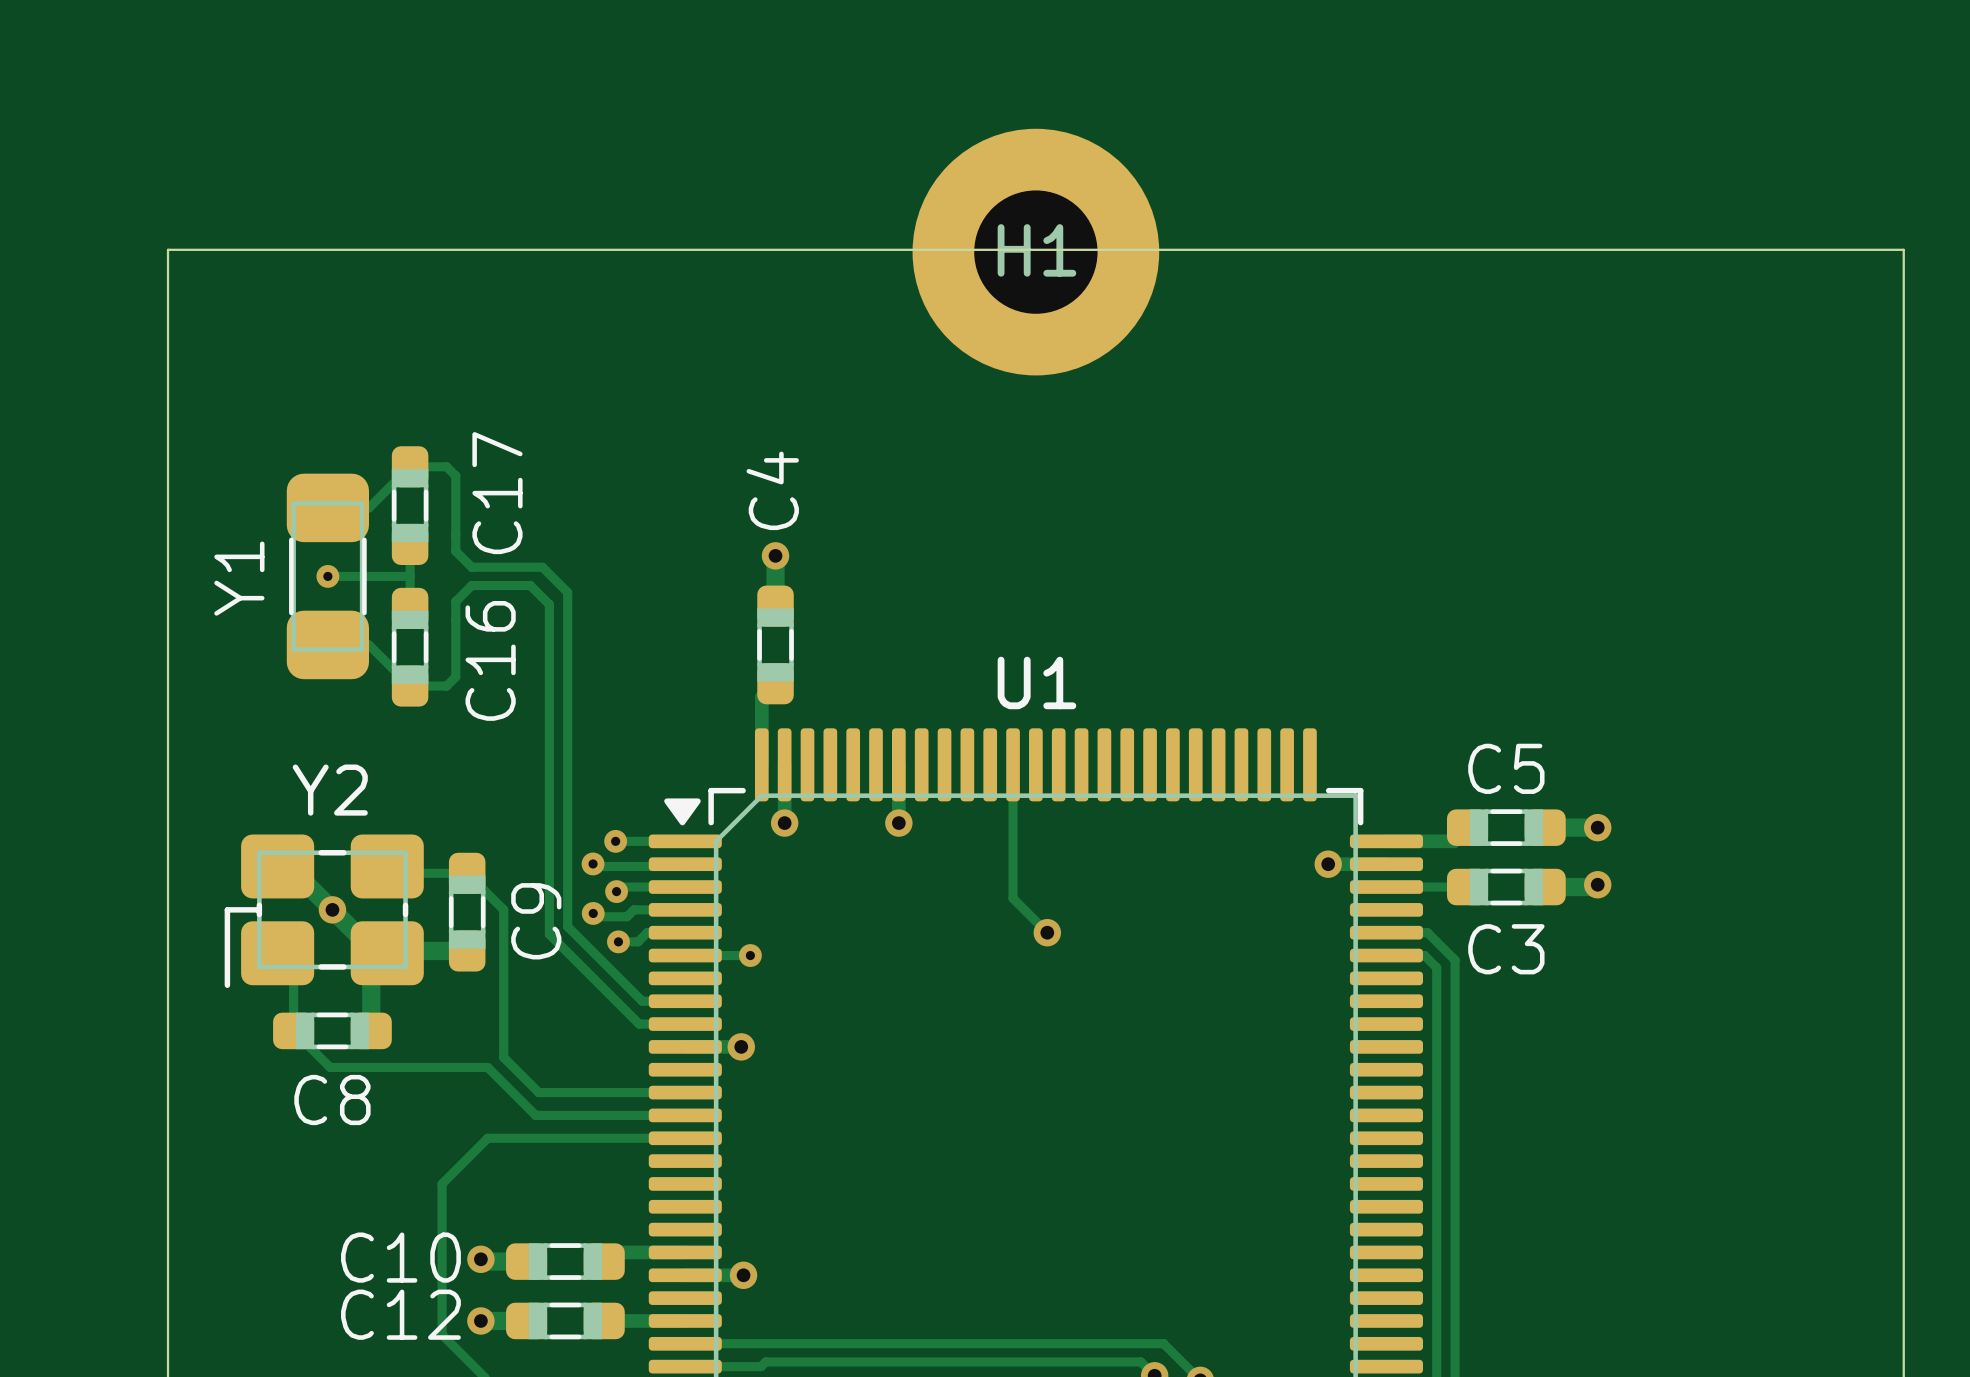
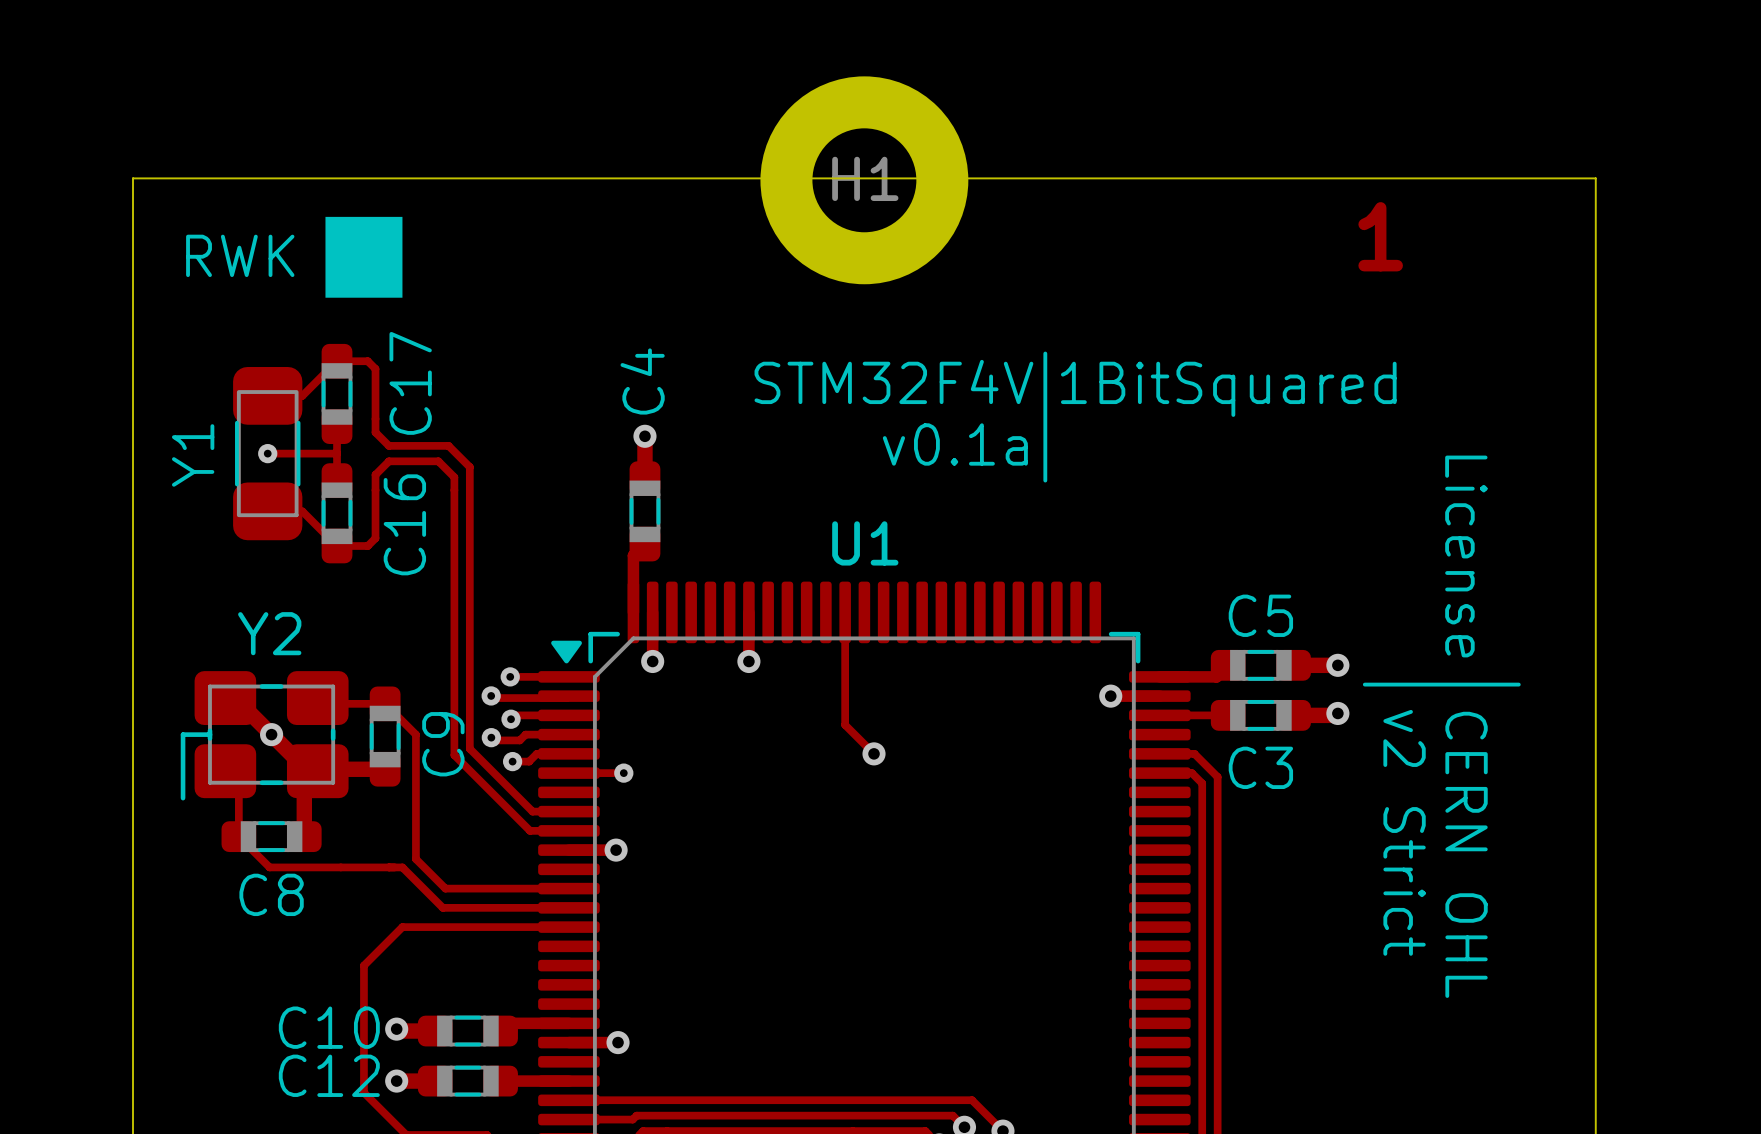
drawing: none -> [325, 216, 403, 298]
text: none -> 1 (1380, 236)
text: none -> RWK (240, 255)
line: none -> (1045, 353) (1045, 480)
text: none -> STM32F4V (893, 381)
text: none -> 1BitSquared (1228, 389)
text: none -> v0.1a (955, 444)
text: none -> License (1466, 556)
line: none -> (1364, 684) (1518, 684)
text: none -> v2 Strict (1404, 832)
text: none -> CERN OHL (1466, 854)

